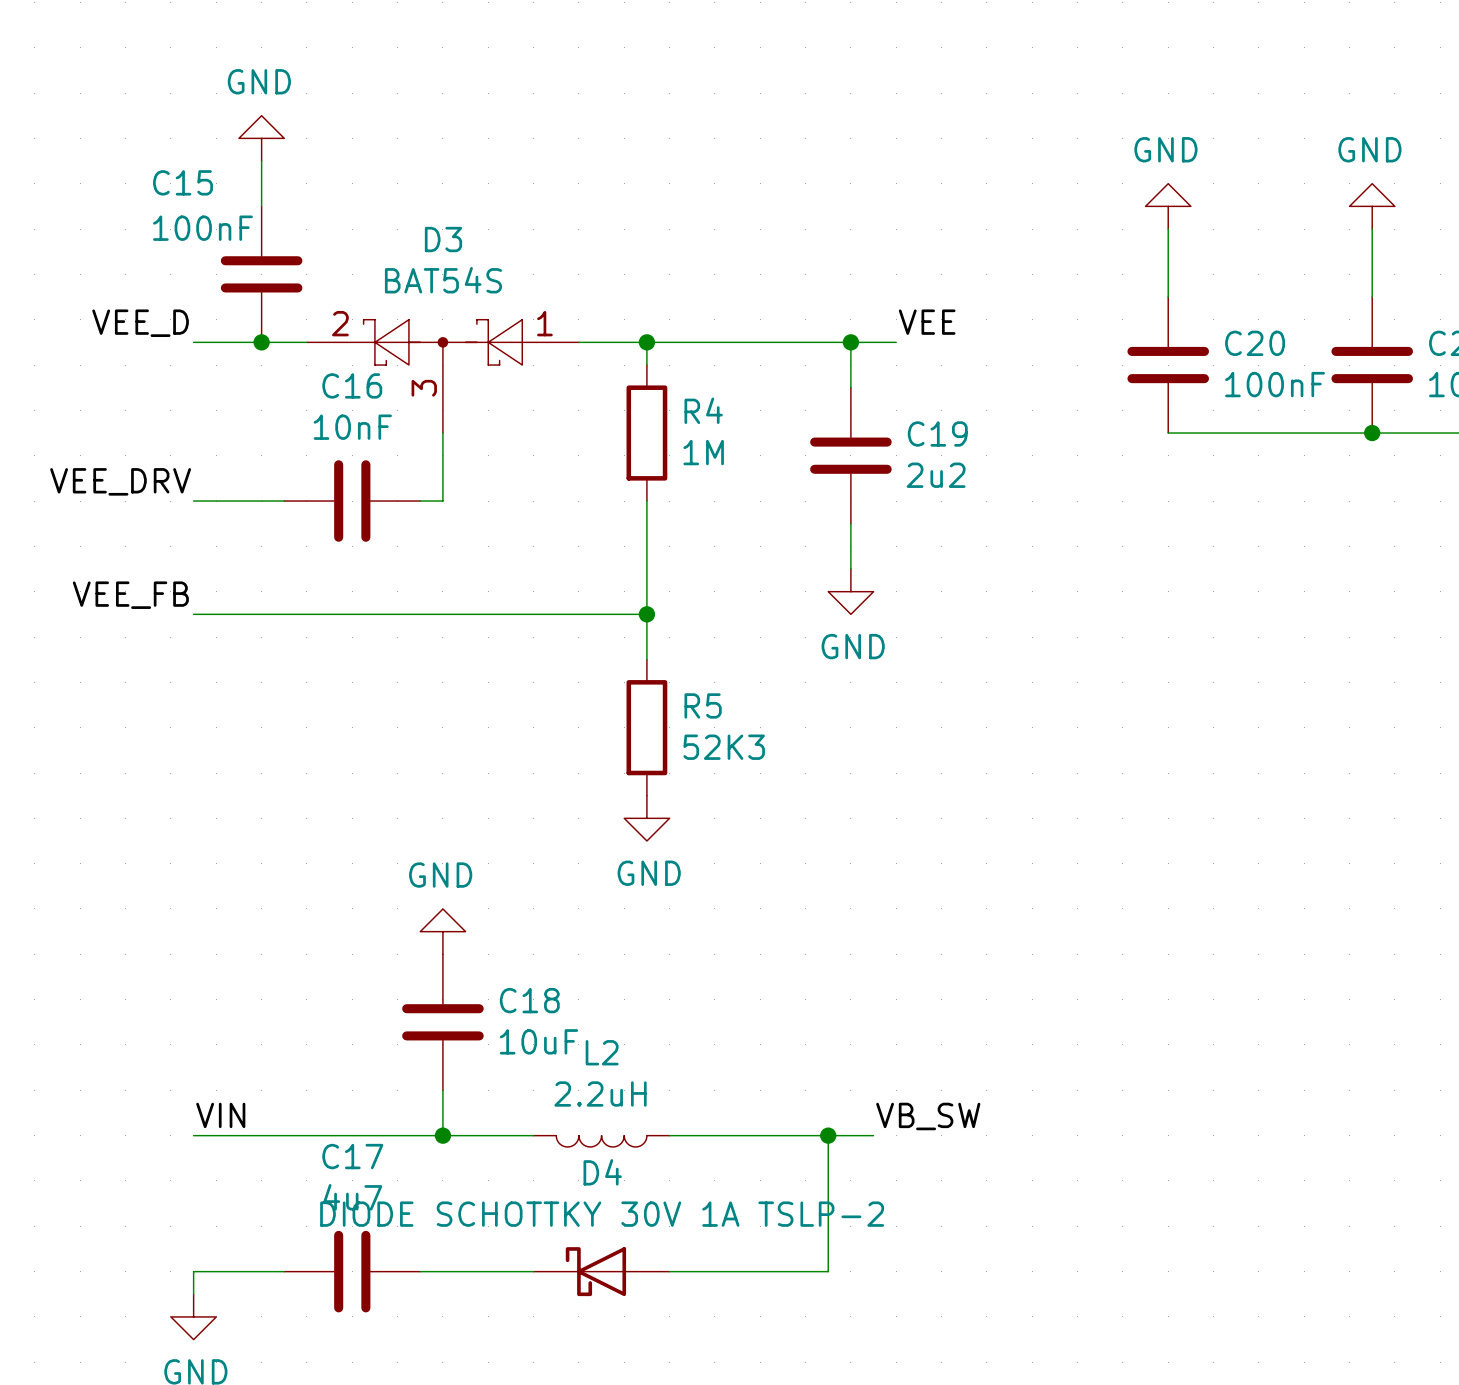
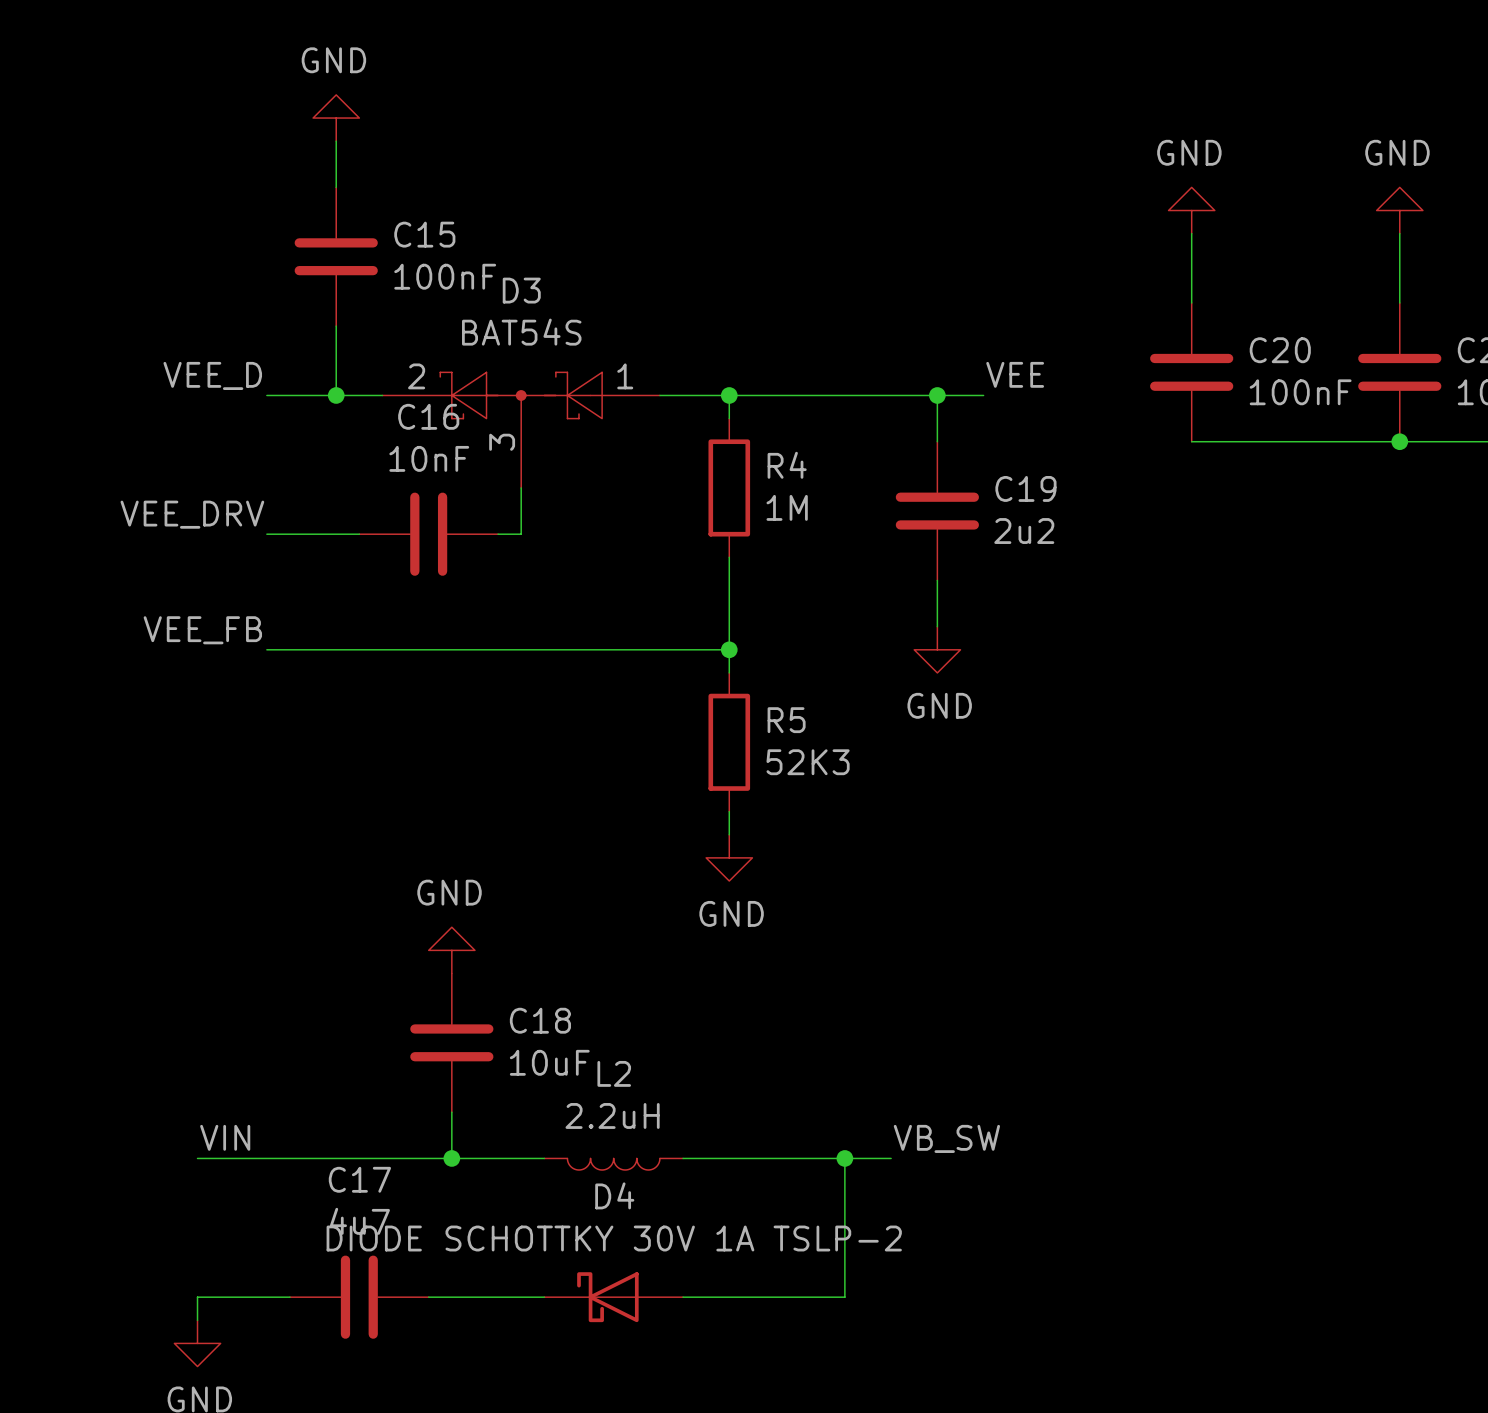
power symbol position: GND (261, 138) -> GND (336, 118)
wire: (261, 161) (261, 206) -> (336, 141) (336, 187)
C15 name position: C15 (183, 182) -> C15 (424, 234)
C15 value position: 100nF (202, 228) -> 100nF (445, 276)
C15 position: (261, 274) -> (336, 256)
wire: none -> (336, 326) (336, 395)
label position: VEE (927, 322) -> VEE (1015, 374)
label position: VEE_D (140, 323) -> VEE_D (212, 375)
wire: (193, 342) (306, 342) -> (266, 395) (382, 395)
junction position: (261, 342) -> (336, 395)
wire: (578, 342) (896, 342) -> (659, 395) (983, 395)
wire: (646, 342) (646, 365) -> (729, 395) (729, 418)
junction: (646, 342) -> none
wire: (850, 342) (850, 387) -> (937, 395) (937, 441)
junction: (850, 342) -> none
D3 position: (442, 376) -> (521, 430)
junction: none -> (729, 395)
junction: none -> (937, 395)
wire: (442, 433) (442, 501) (420, 501) -> none
R4 position: (646, 433) -> (729, 487)
C19 position: (850, 455) -> (937, 511)
wire: none -> (521, 487) (521, 534) (498, 534)
label position: VEE_DRV (120, 481) -> VEE_DRV (192, 514)
wire: (193, 501) (284, 501) -> (266, 534) (359, 534)
C16 position: (352, 501) -> (428, 534)
wire: (646, 501) (646, 659) -> none
wire: (850, 523) (850, 569) -> (937, 580) (937, 626)
wire: none -> (729, 557) (729, 672)
power symbol position: GND (850, 591) -> GND (937, 649)
label position: VEE_FB (130, 595) -> VEE_FB (202, 630)
wire: (193, 614) (646, 614) -> (266, 649) (729, 649)
junction position: (646, 614) -> (729, 649)
R5 position: (646, 727) -> (729, 742)
wire: none -> (729, 811) (729, 834)
power symbol position: GND (646, 818) -> GND (729, 857)

